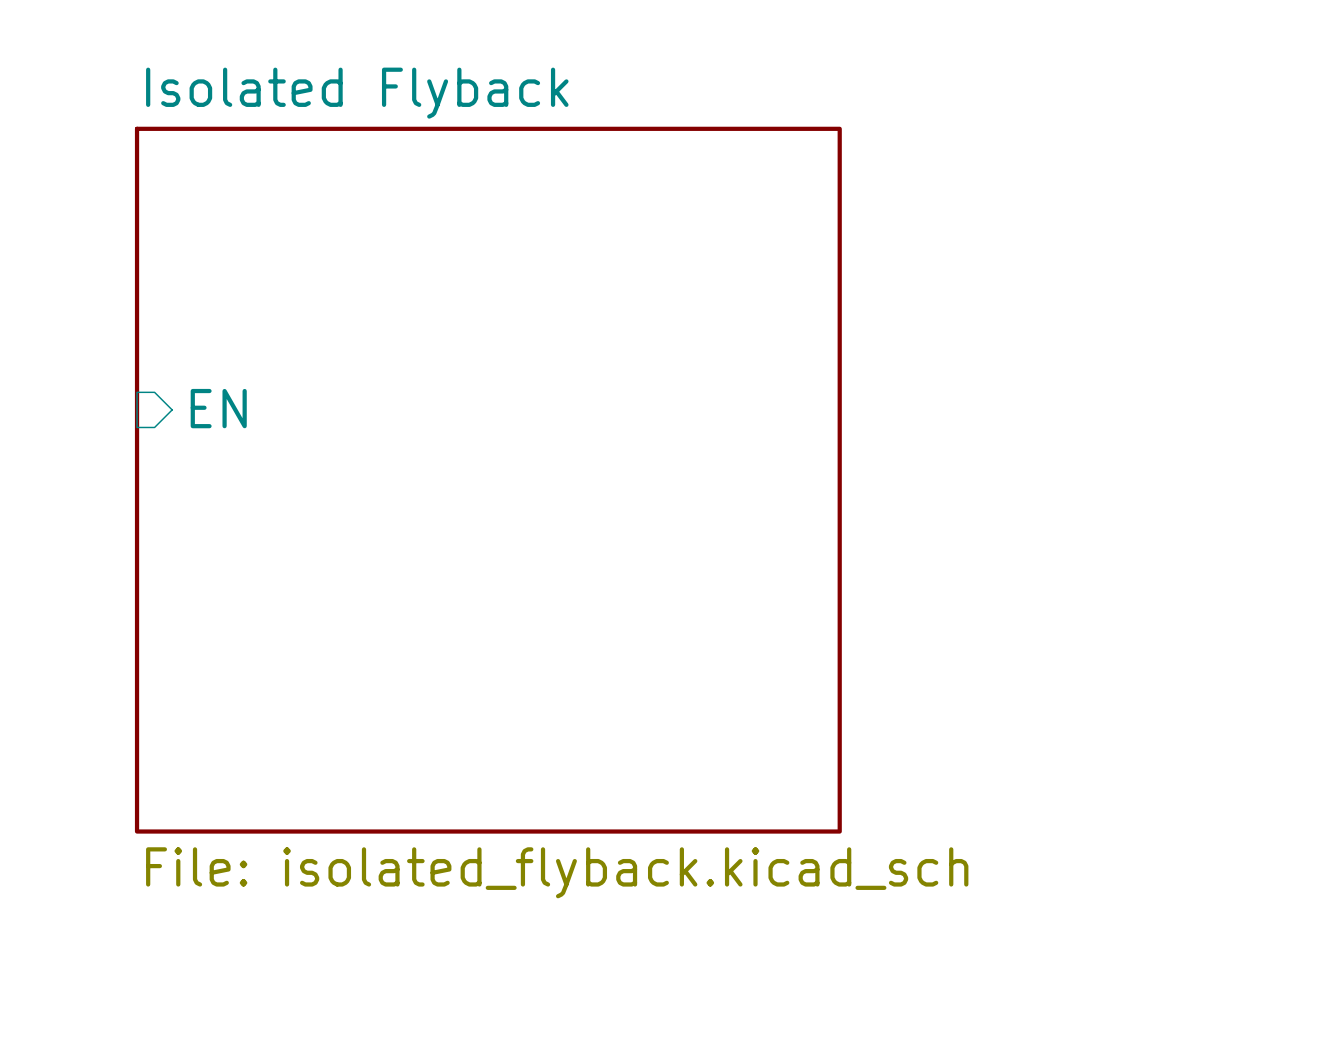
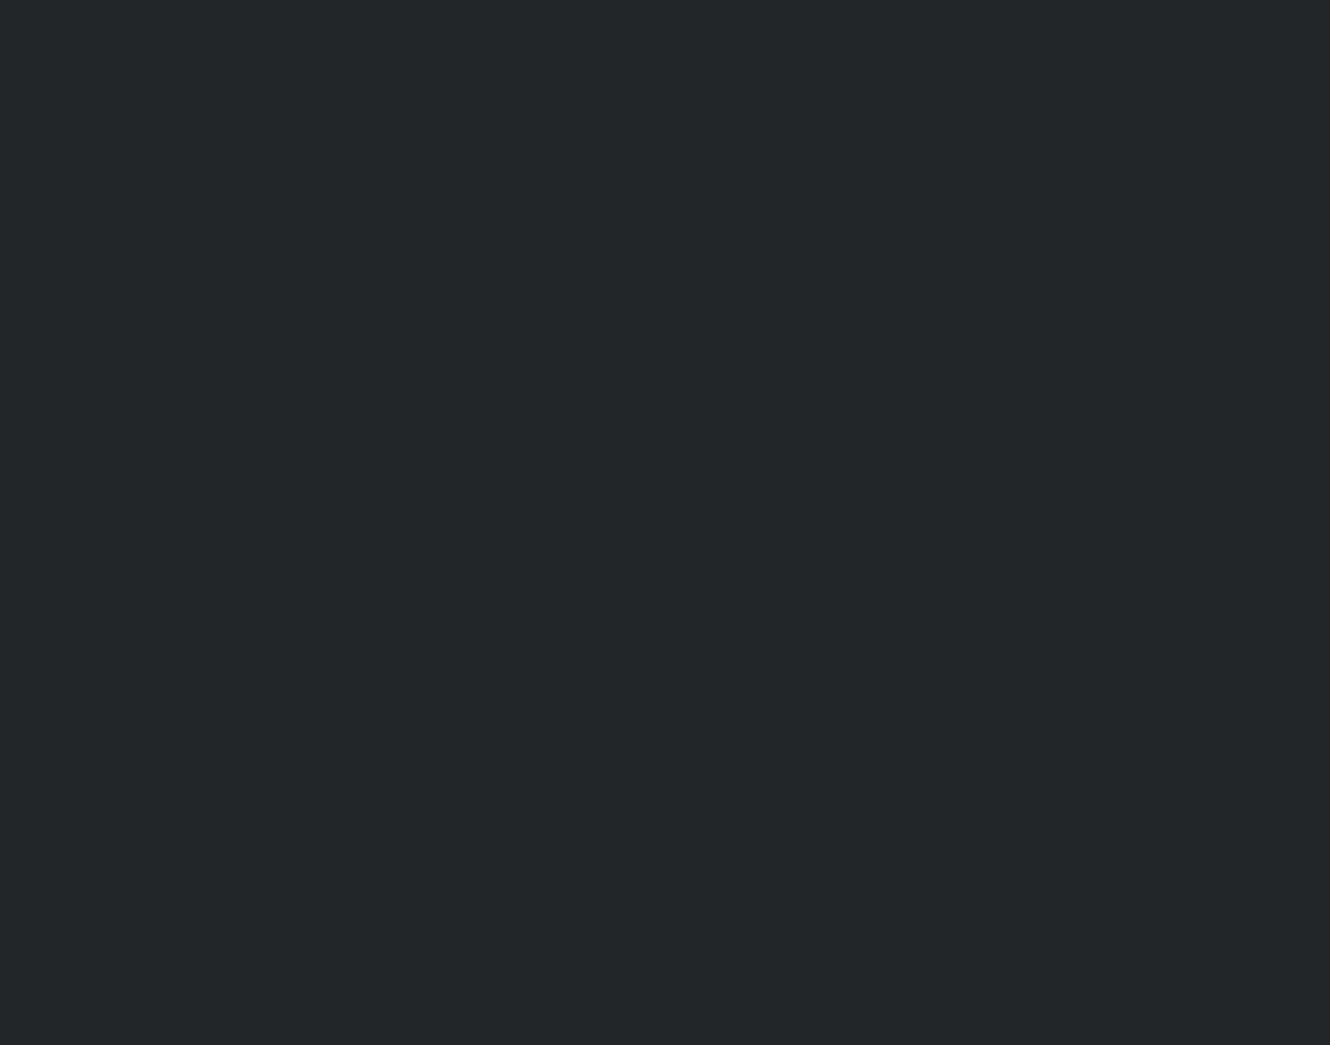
sheet pin: EN (218, 408) -> none
sheet Isolated Flyback: File: isolated_flyback.kicad_sch (488, 480) -> none

